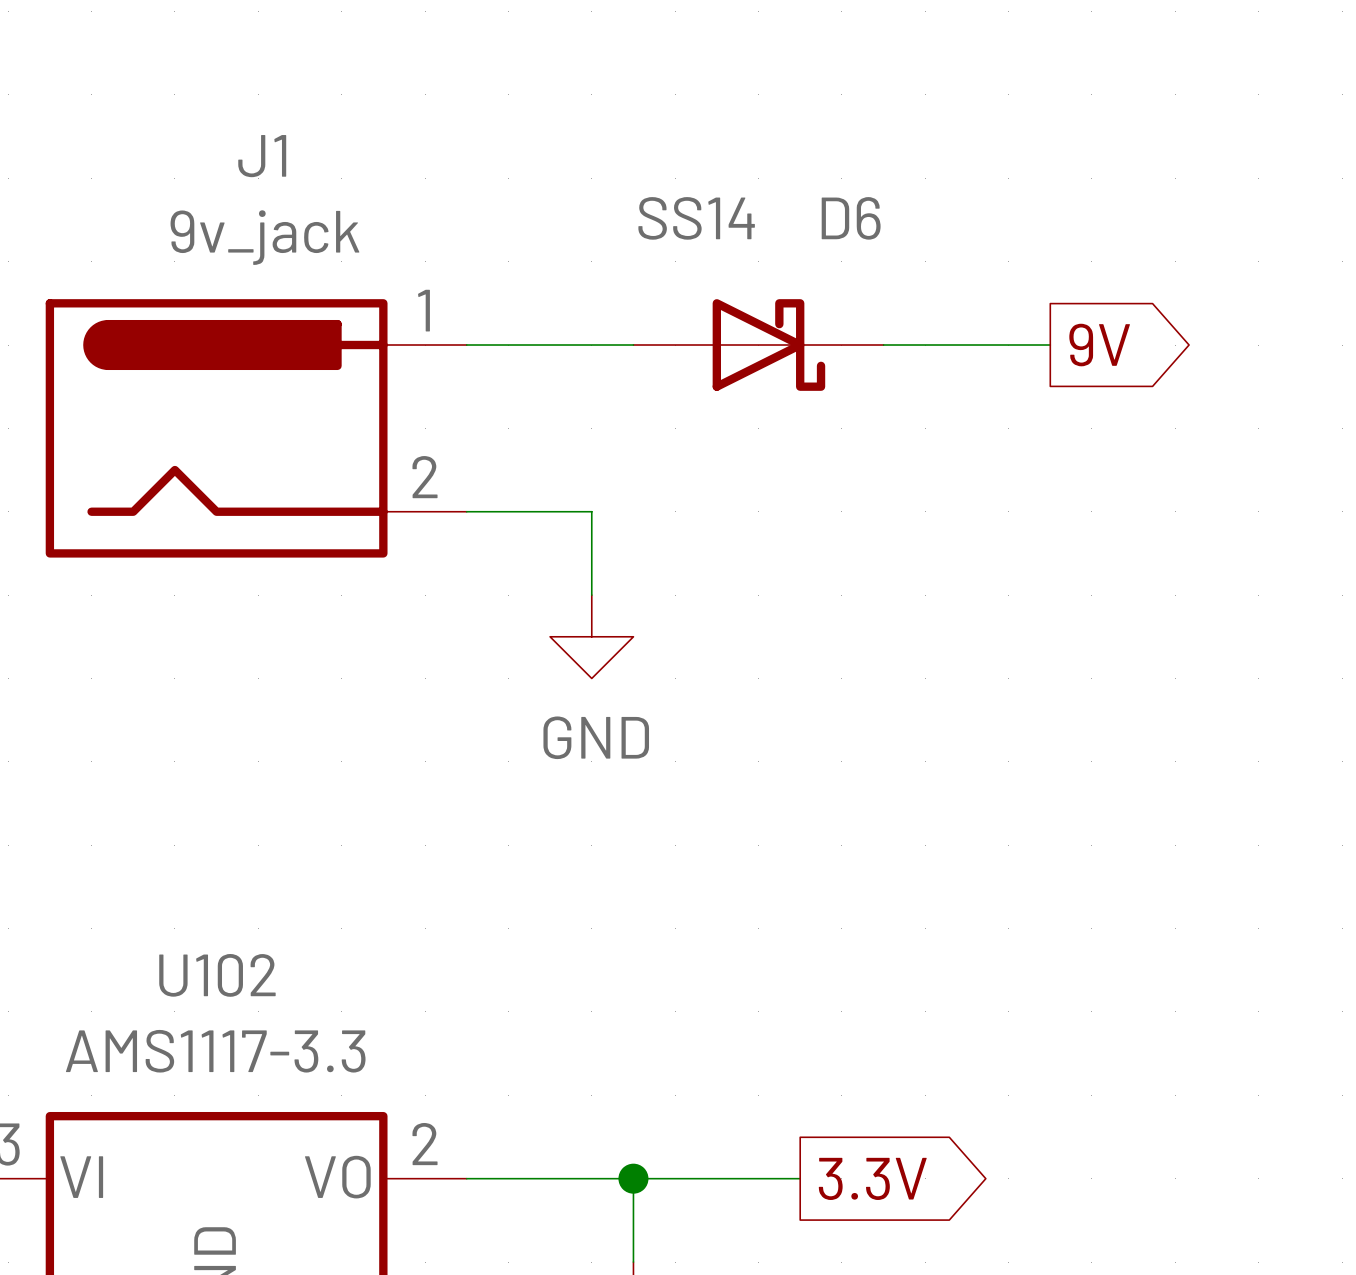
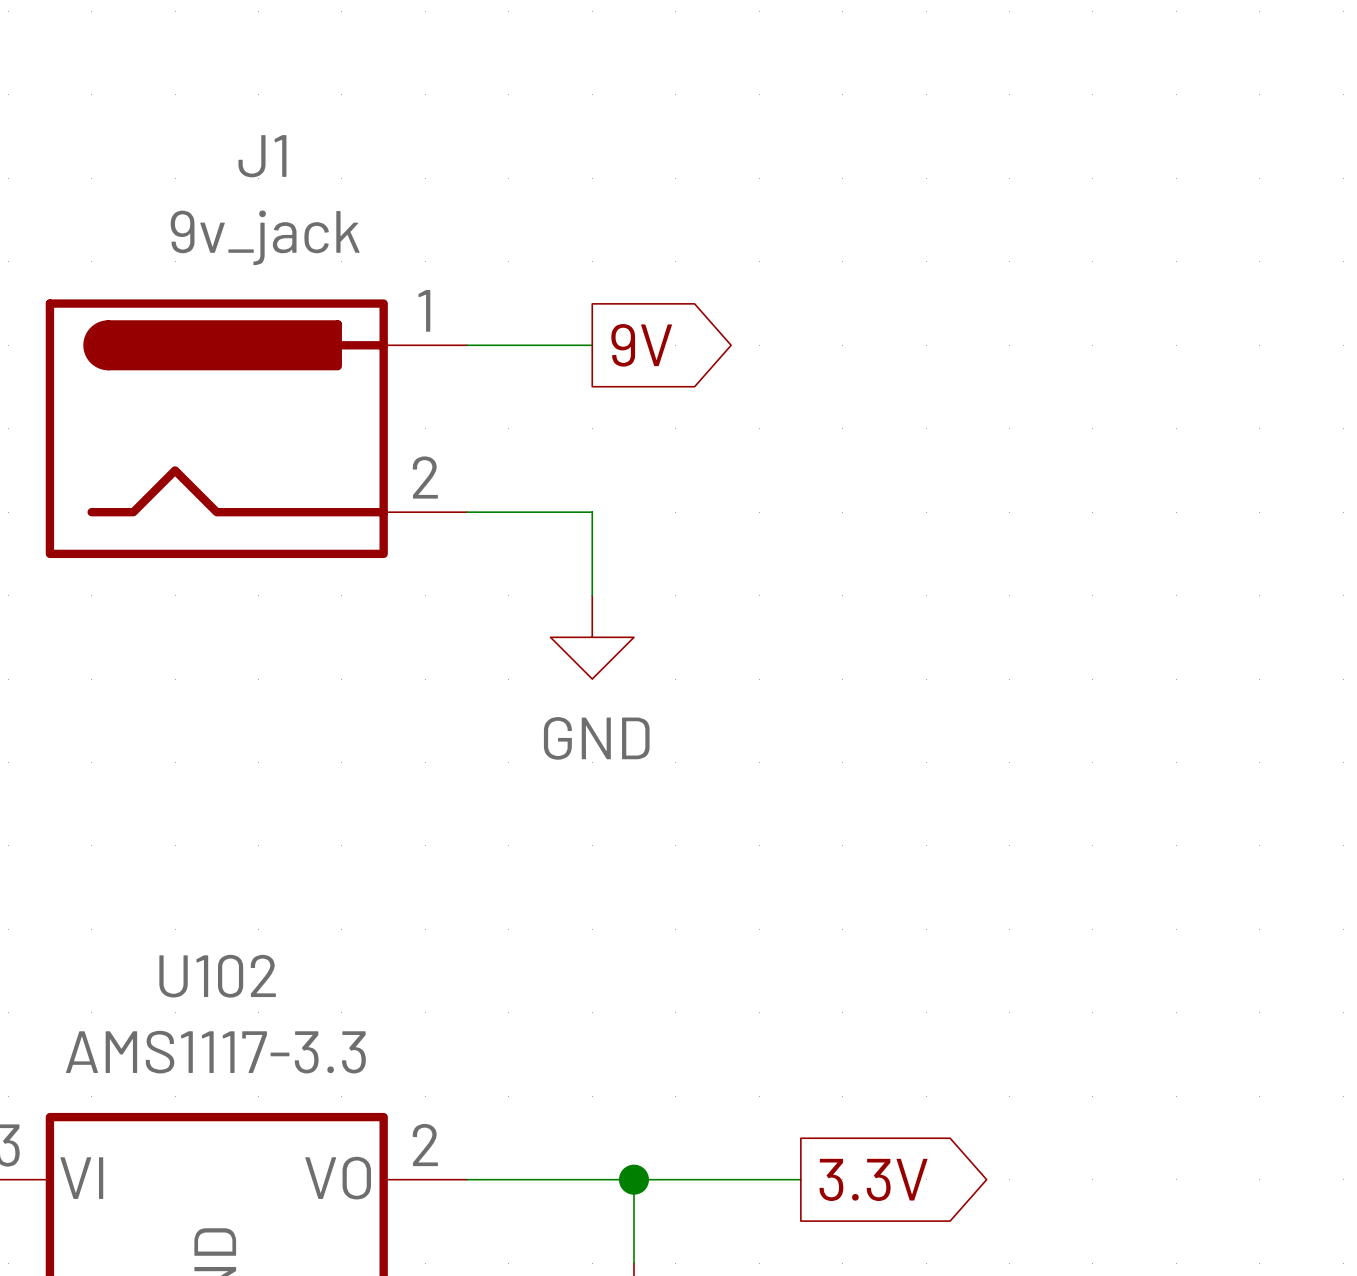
wire: (591, 345) (633, 345) -> none
D6: SS14 (758, 345) -> none
wire: (883, 345) (1050, 345) -> none
global label position: 9V (1099, 345) -> 9V (641, 345)

